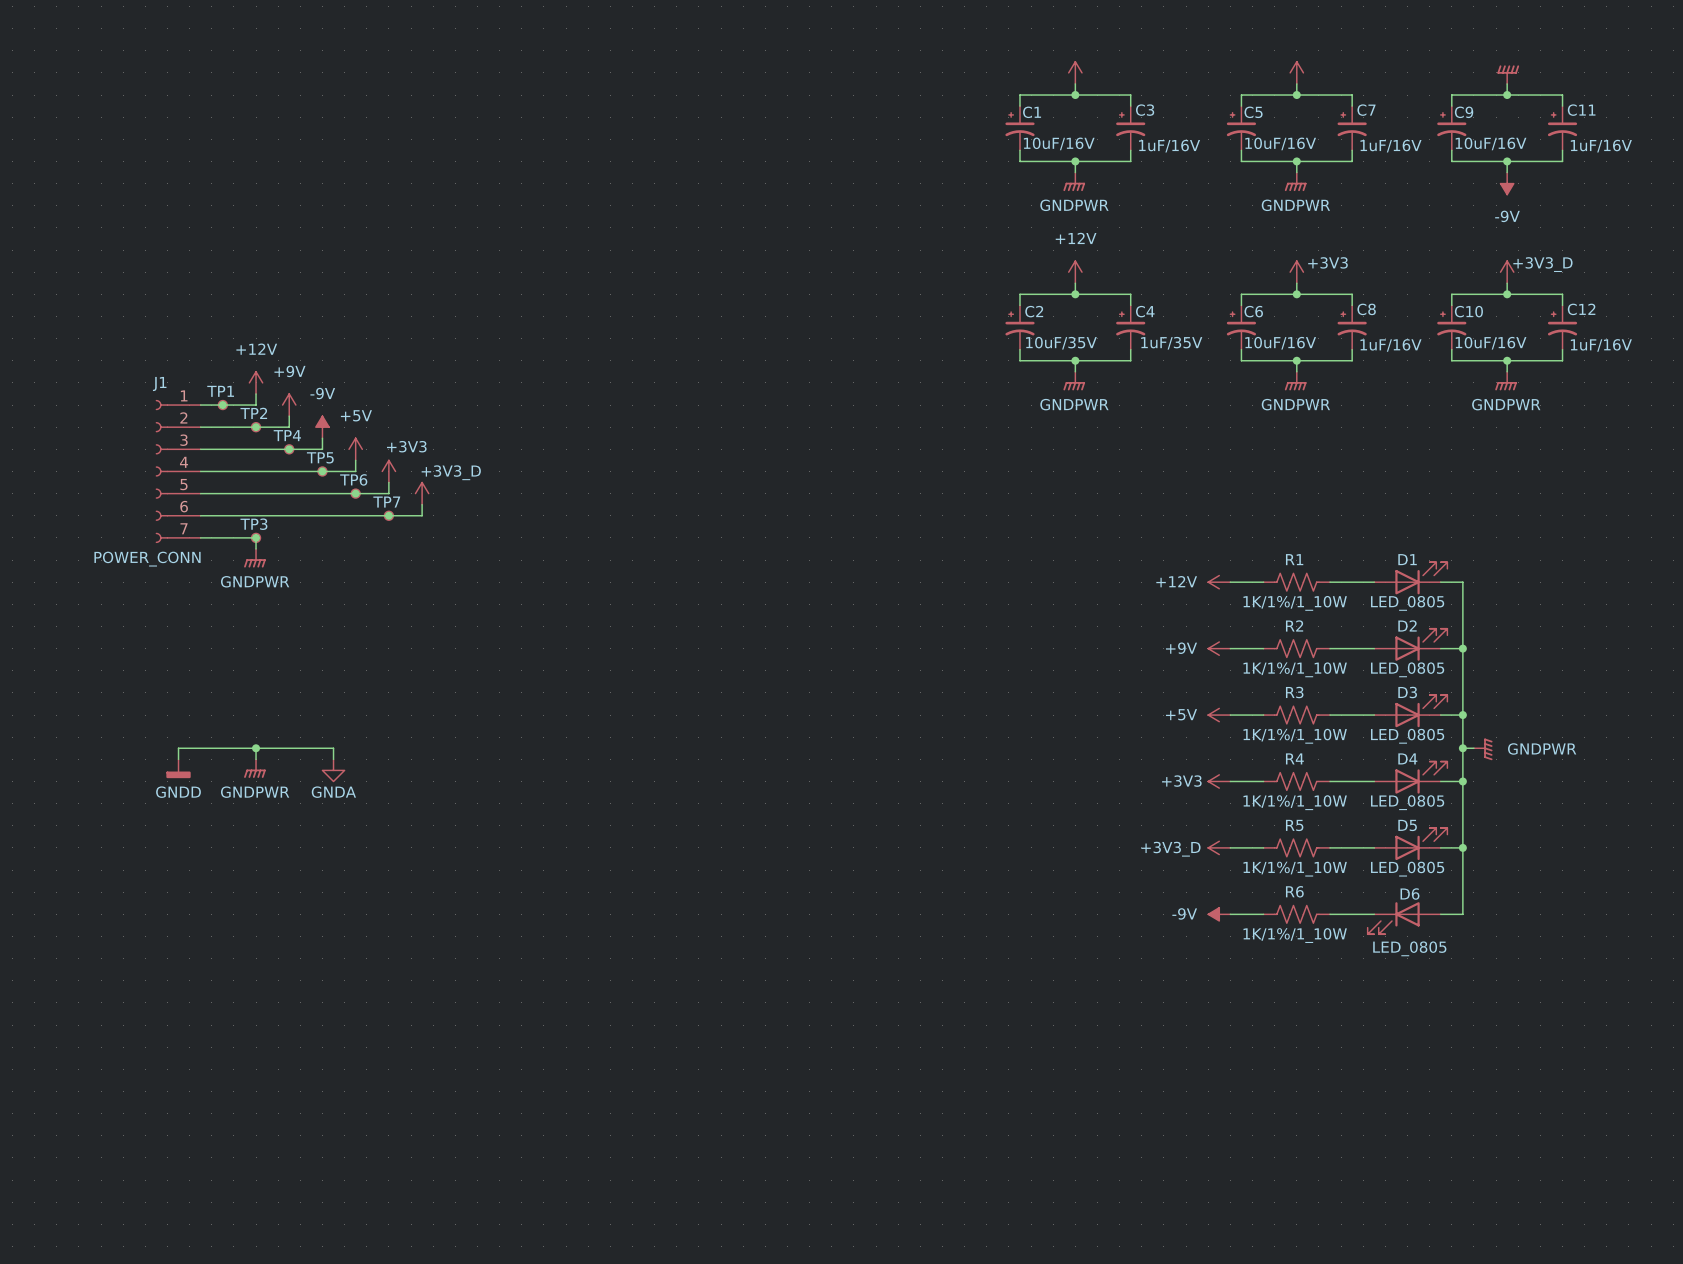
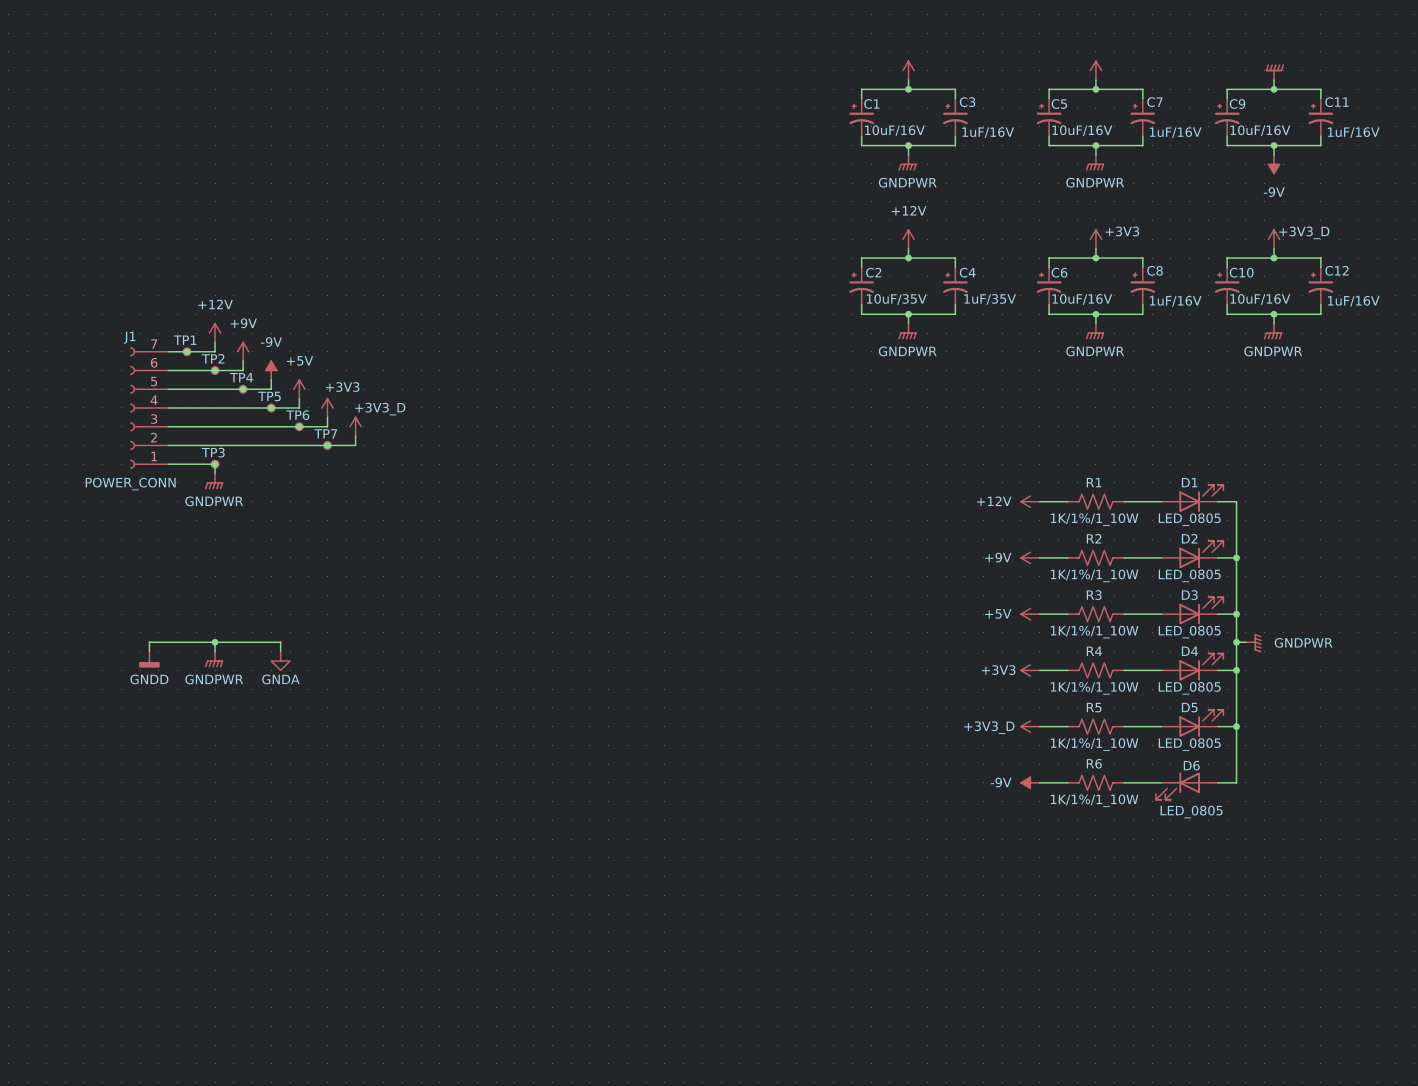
J1 flip: as is (161, 471) -> up-down (135, 407)

